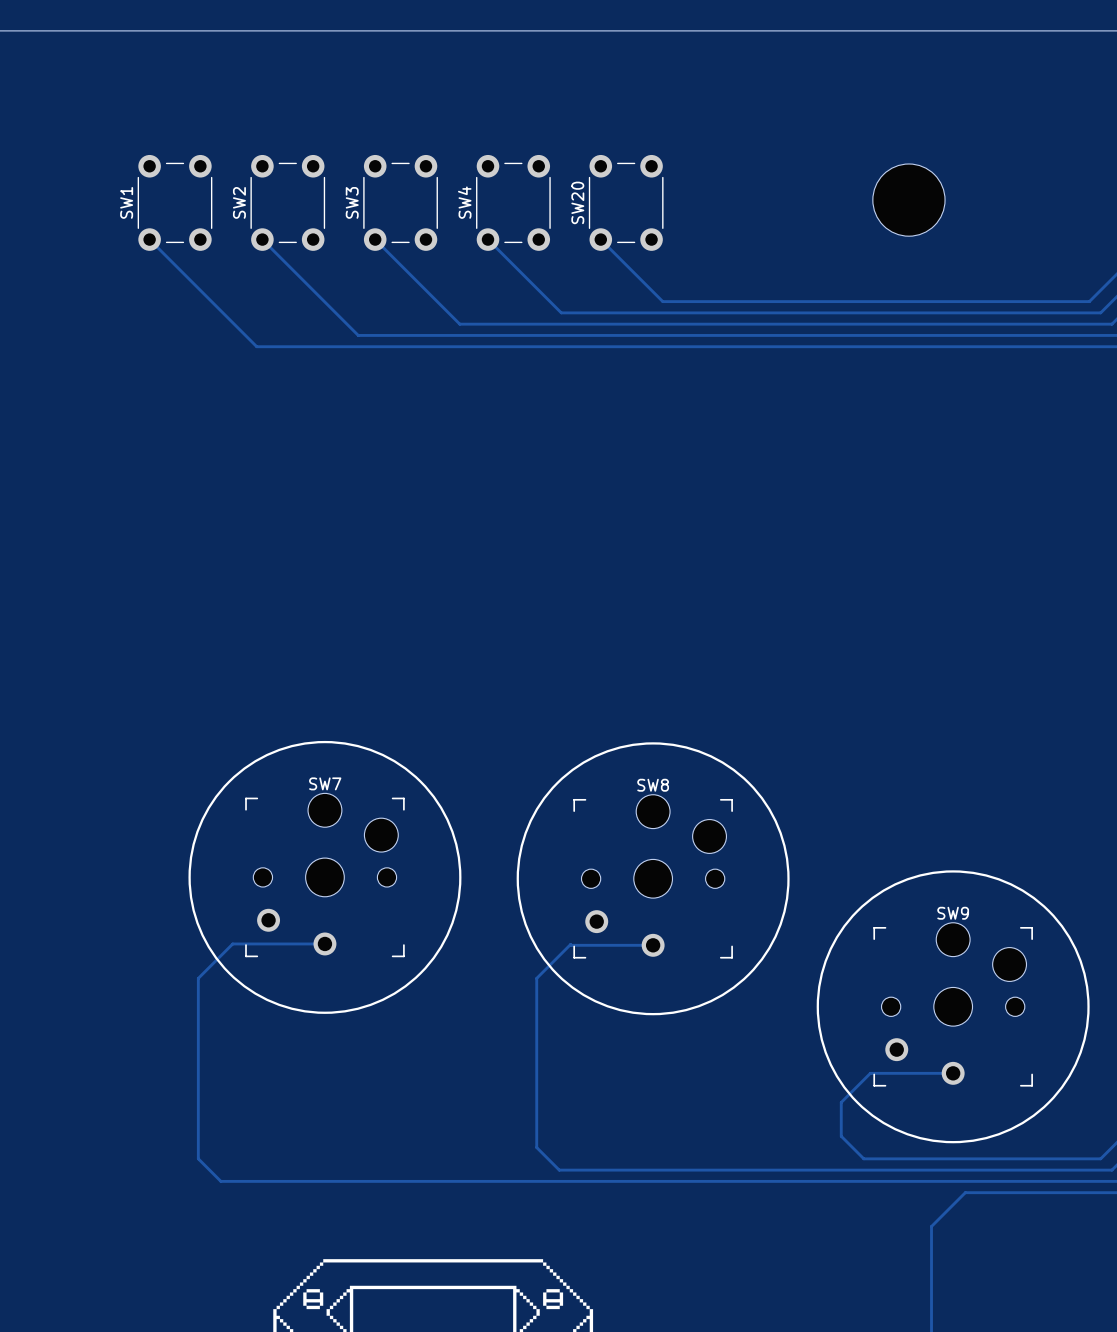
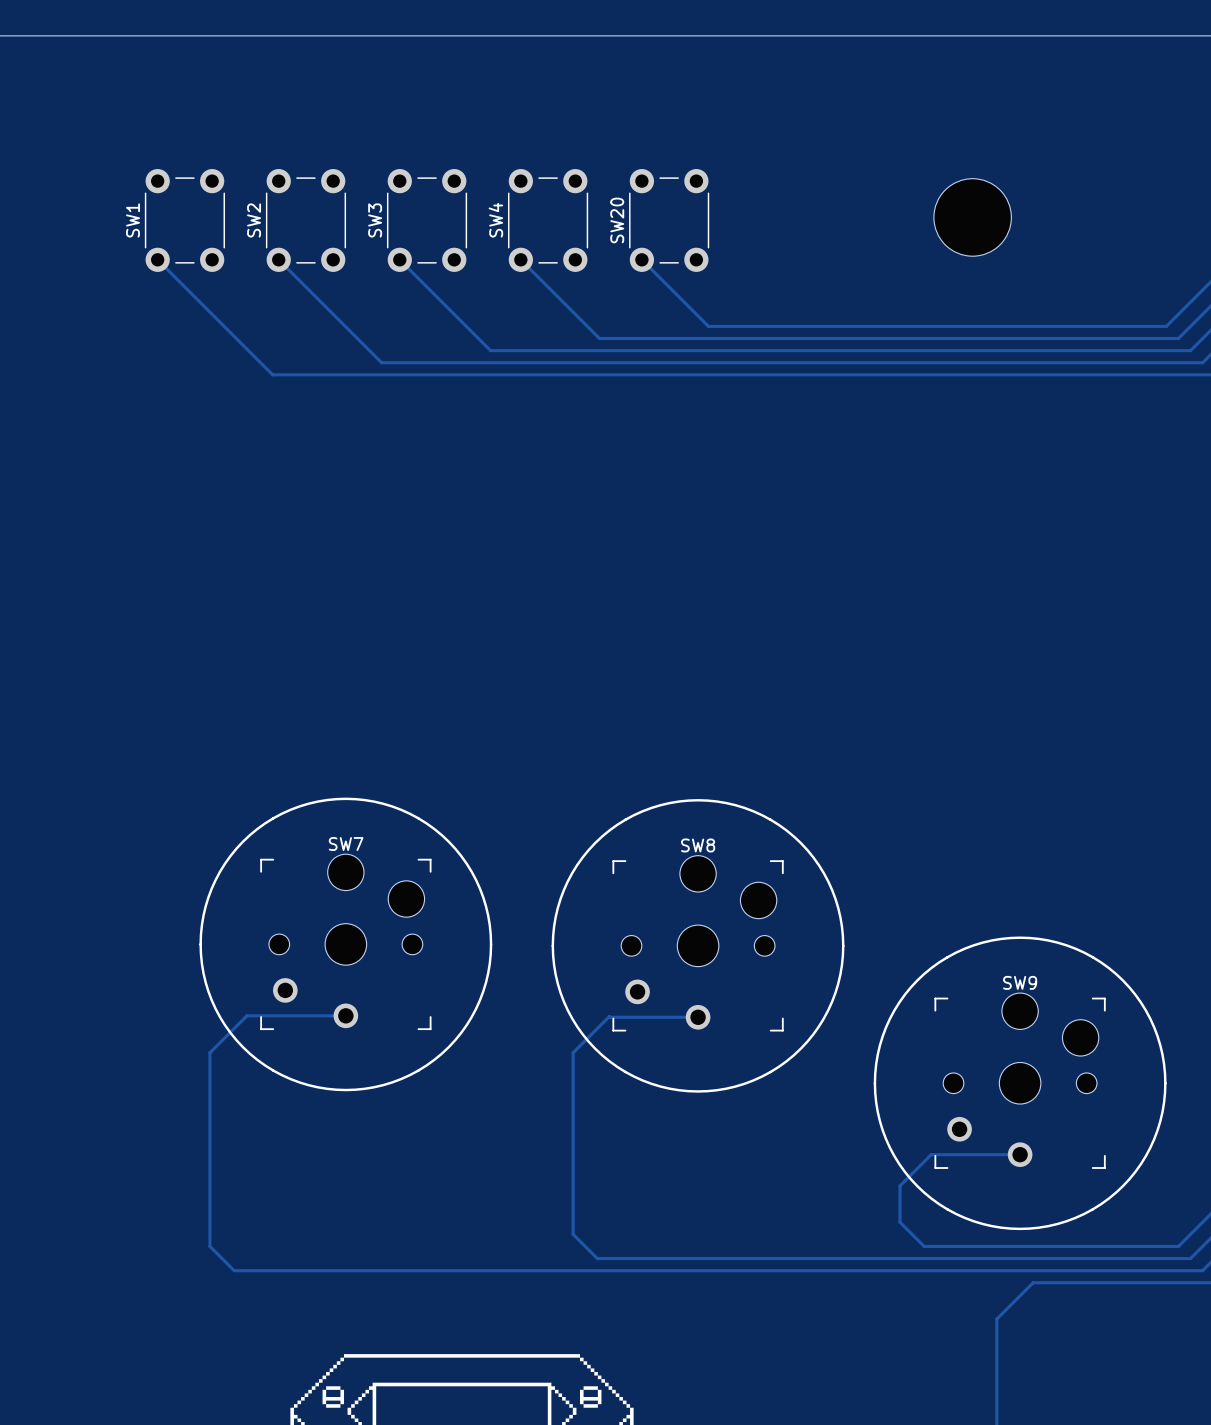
SW7 footprint: [188, 740, 462, 1014] -> [260, 854, 432, 1031]
SW8 footprint: [516, 742, 790, 1016] -> [612, 855, 784, 1032]
line: none -> (273, 818) (299, 806) (327, 800) (355, 799) (383, 803) (409, 813) (434, 829) (455, 848) (471, 871) (483, 897) (489, 925) (490, 954) (486, 982) (476, 1008) (461, 1032) (441, 1053) (418, 1070) (392, 1082) (364, 1088) (336, 1089) (308, 1085) (281, 1075) (257, 1059) (236, 1040) (220, 1017) (208, 991) (201, 963) (200, 934) (205, 906) (215, 879) (230, 855) (249, 835) (273, 818)
line: none -> (625, 819) (602, 836) (582, 857) (567, 881) (557, 907) (553, 936) (554, 965) (560, 992) (572, 1018) (588, 1041) (609, 1061) (633, 1076) (660, 1086) (688, 1091) (716, 1090) (744, 1083) (770, 1071) (794, 1055) (813, 1034) (828, 1010) (838, 983) (842, 955) (841, 926) (835, 898) (823, 873) (807, 850) (786, 830) (762, 815) (735, 805) (707, 800) (679, 801) (651, 807) (625, 819)
SW9 footprint: [816, 870, 1090, 1144] -> [934, 993, 1106, 1169]
line: none -> (947, 957) (924, 974) (904, 994) (889, 1018) (879, 1045) (875, 1073) (876, 1102) (882, 1130) (894, 1156) (910, 1179) (931, 1198) (956, 1213) (982, 1224) (1010, 1228) (1038, 1227) (1066, 1221) (1092, 1209) (1116, 1192) (1135, 1171) (1150, 1147) (1160, 1121) (1165, 1093) (1164, 1064) (1157, 1036) (1145, 1010) (1129, 987) (1108, 967) (1084, 952) (1057, 942) (1029, 938) (1001, 938) (973, 945) (947, 957)

